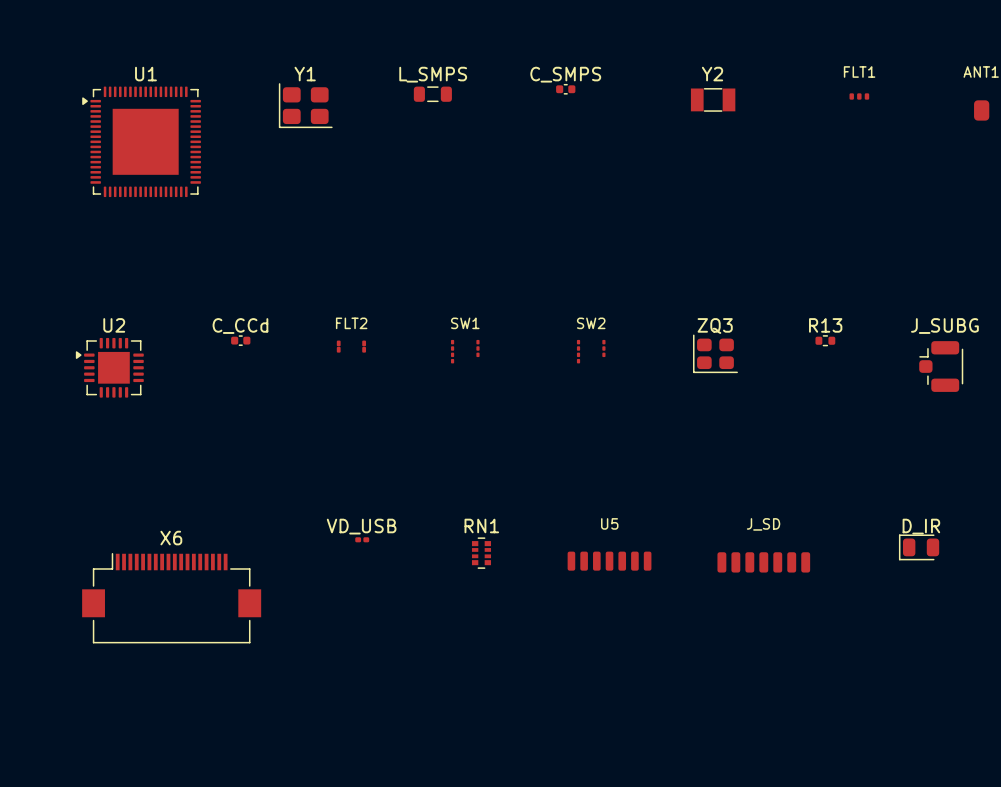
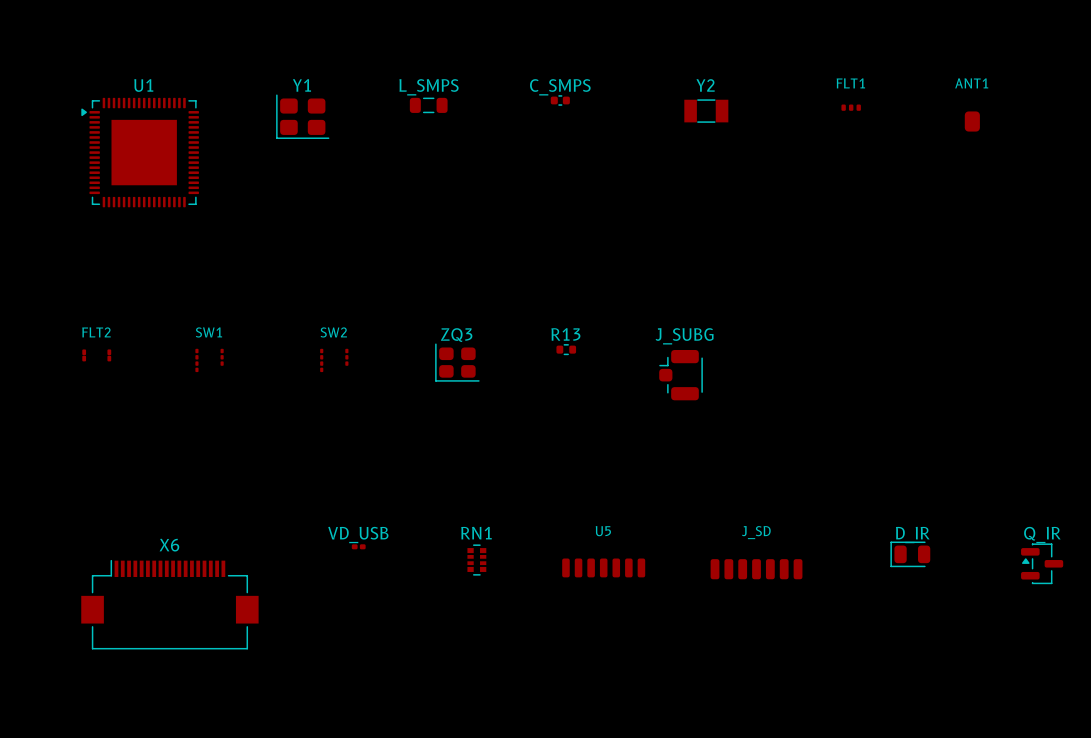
C_CCd: (240, 340) -> none
R13 position: (825, 340) -> (566, 349)
FLT2 position: (351, 346) -> (96, 355)
SW1 position: (465, 351) -> (209, 360)
SW2 position: (591, 351) -> (334, 360)
ZQ3 position: (715, 353) -> (457, 362)
J_SUBG position: (941, 366) -> (681, 375)
U2: (109, 367) -> none

